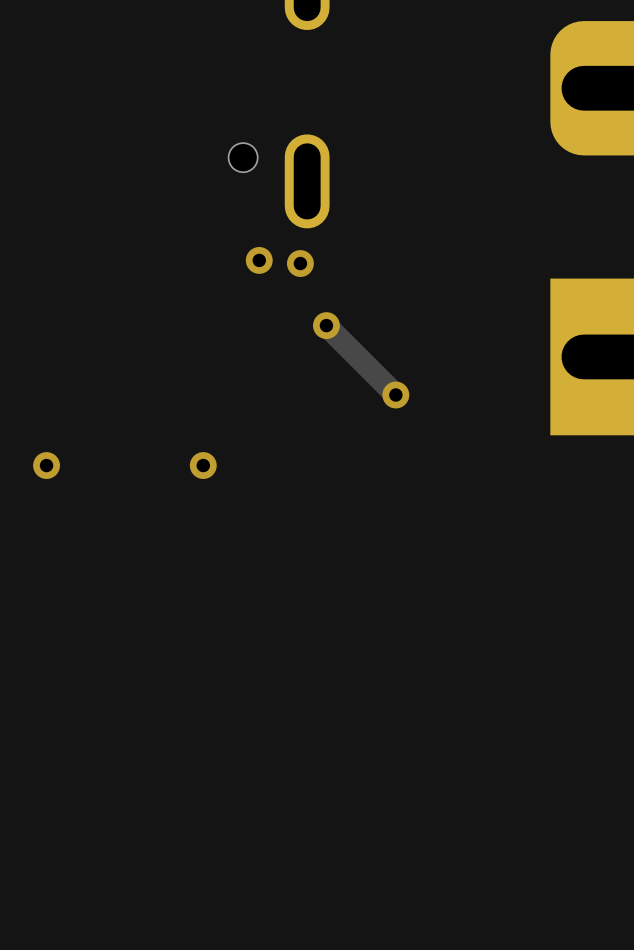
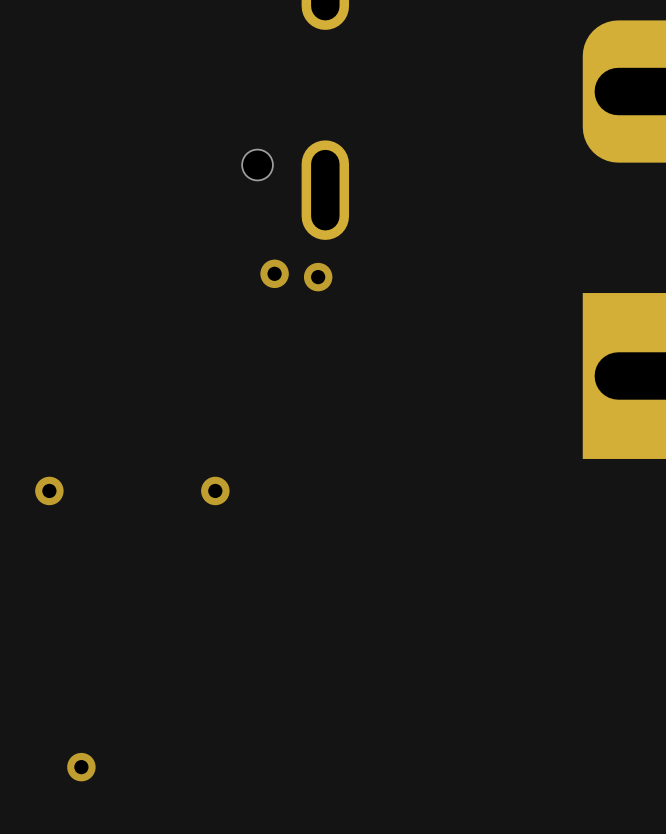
track: (326, 325) (395, 395) -> none
via: (326, 325) -> none
via: (395, 395) -> none
via: none -> (81, 767)

